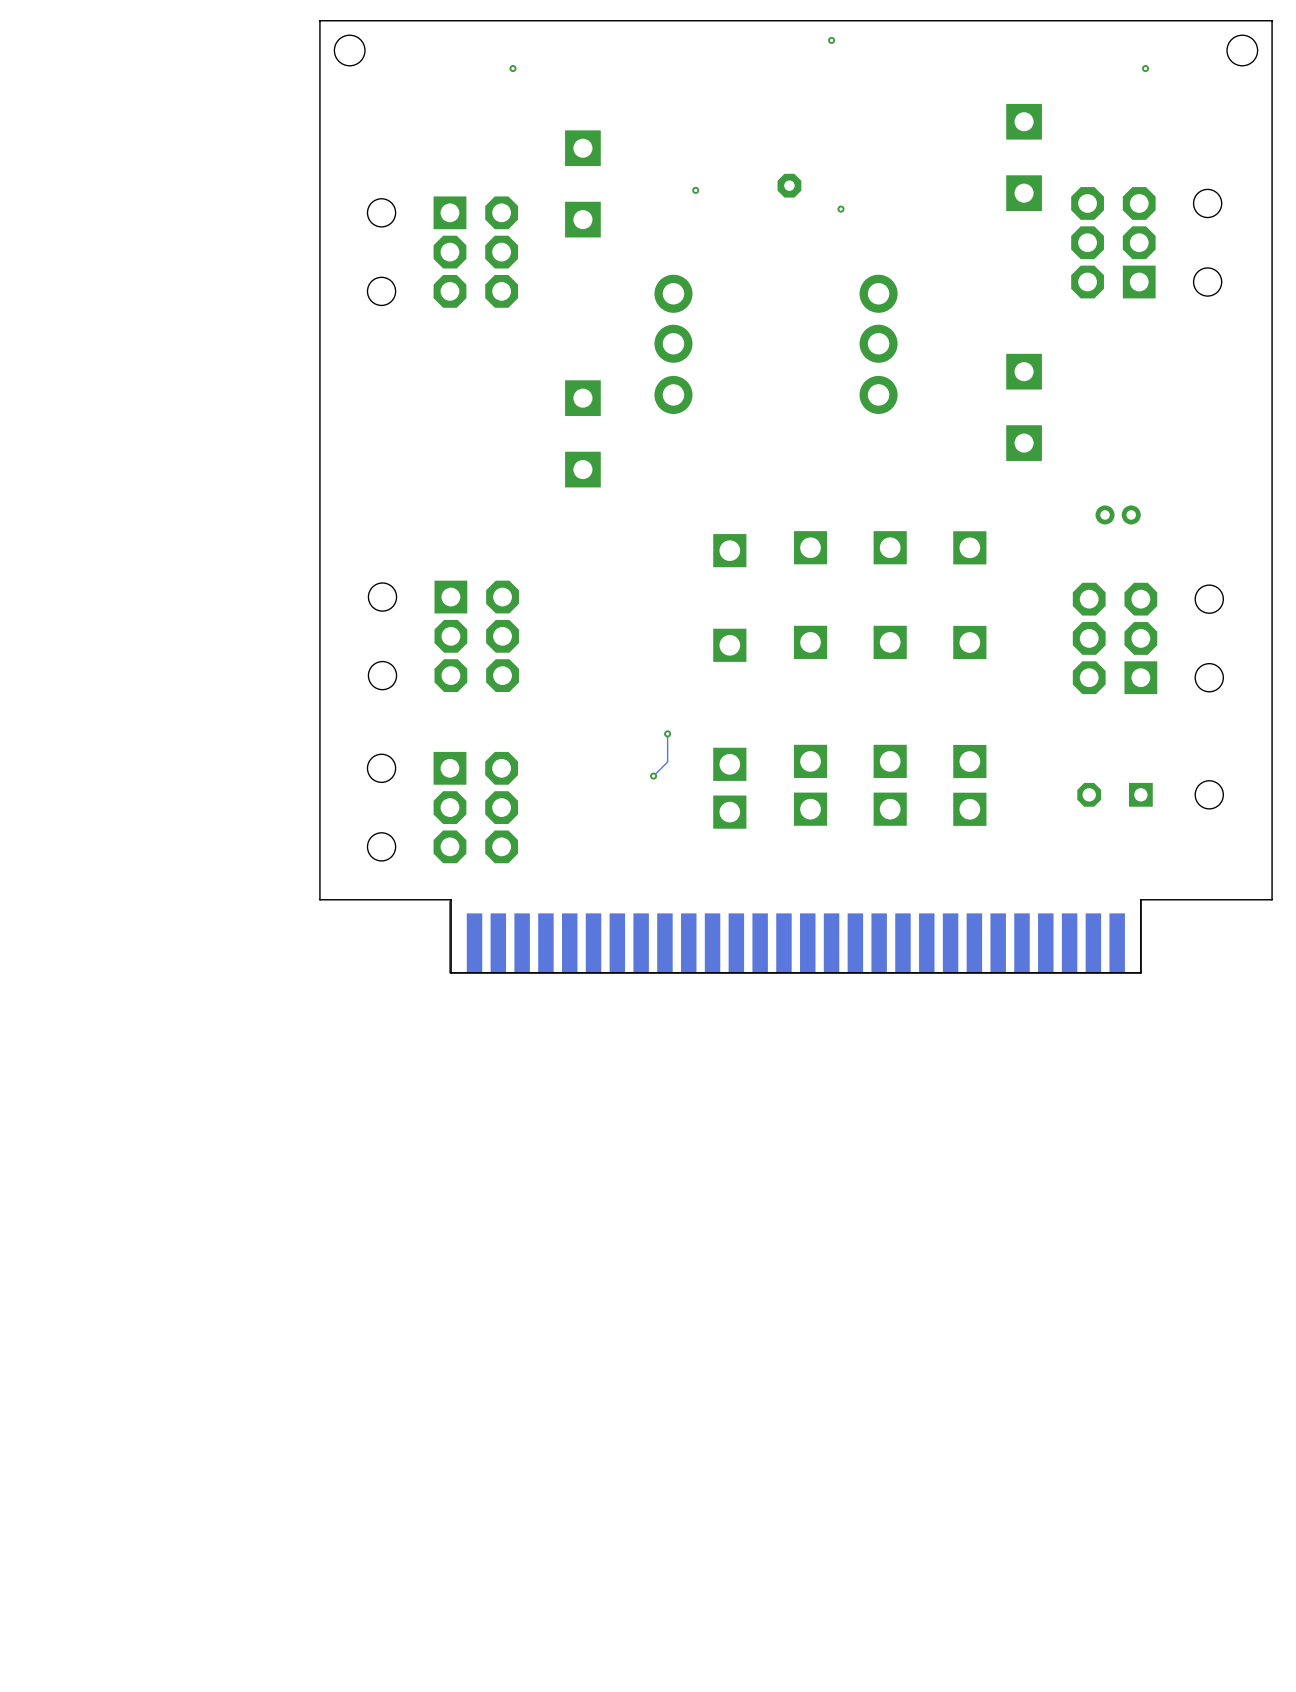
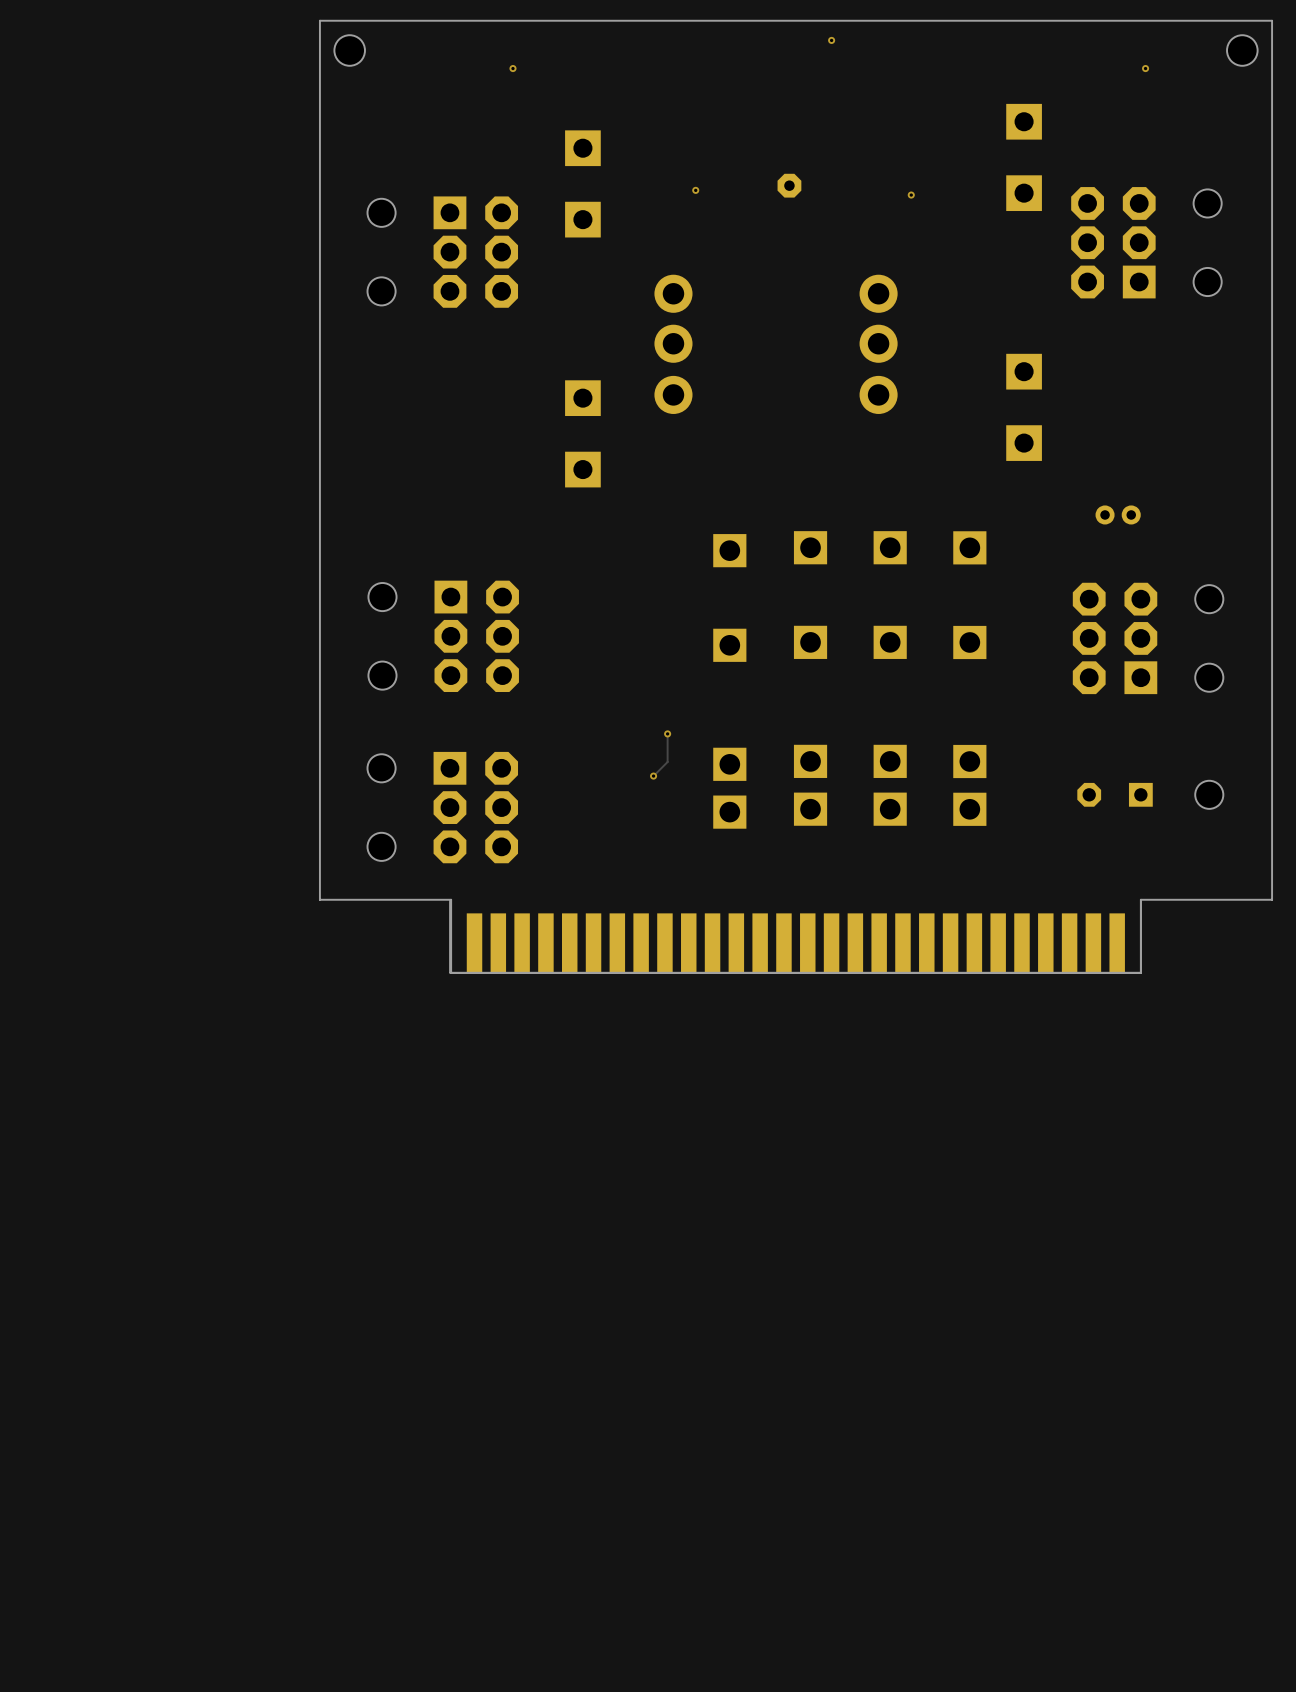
via: none -> (911, 195)
via: (840, 209) -> none

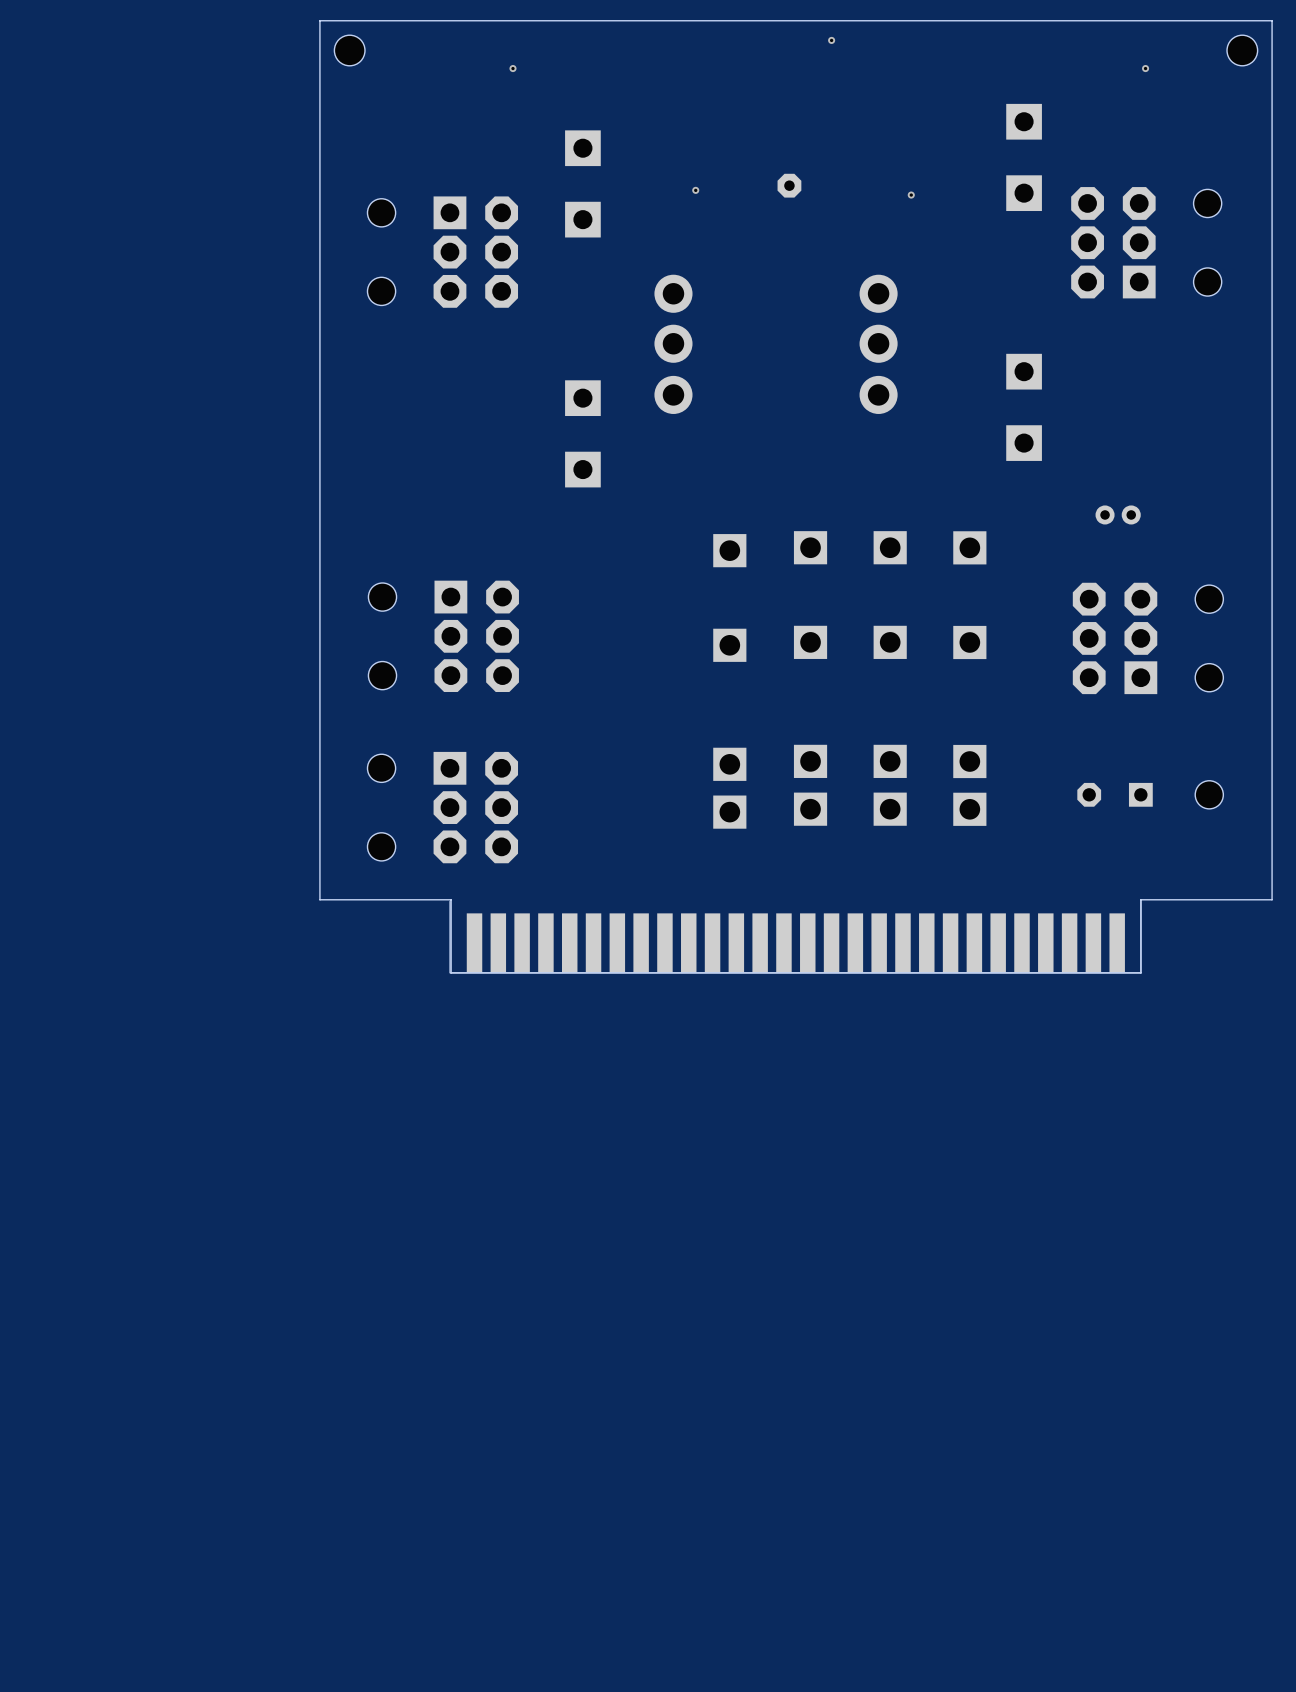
track: (667, 733) (667, 762) (653, 776) -> none
via: (667, 733) -> none
via: (653, 776) -> none

